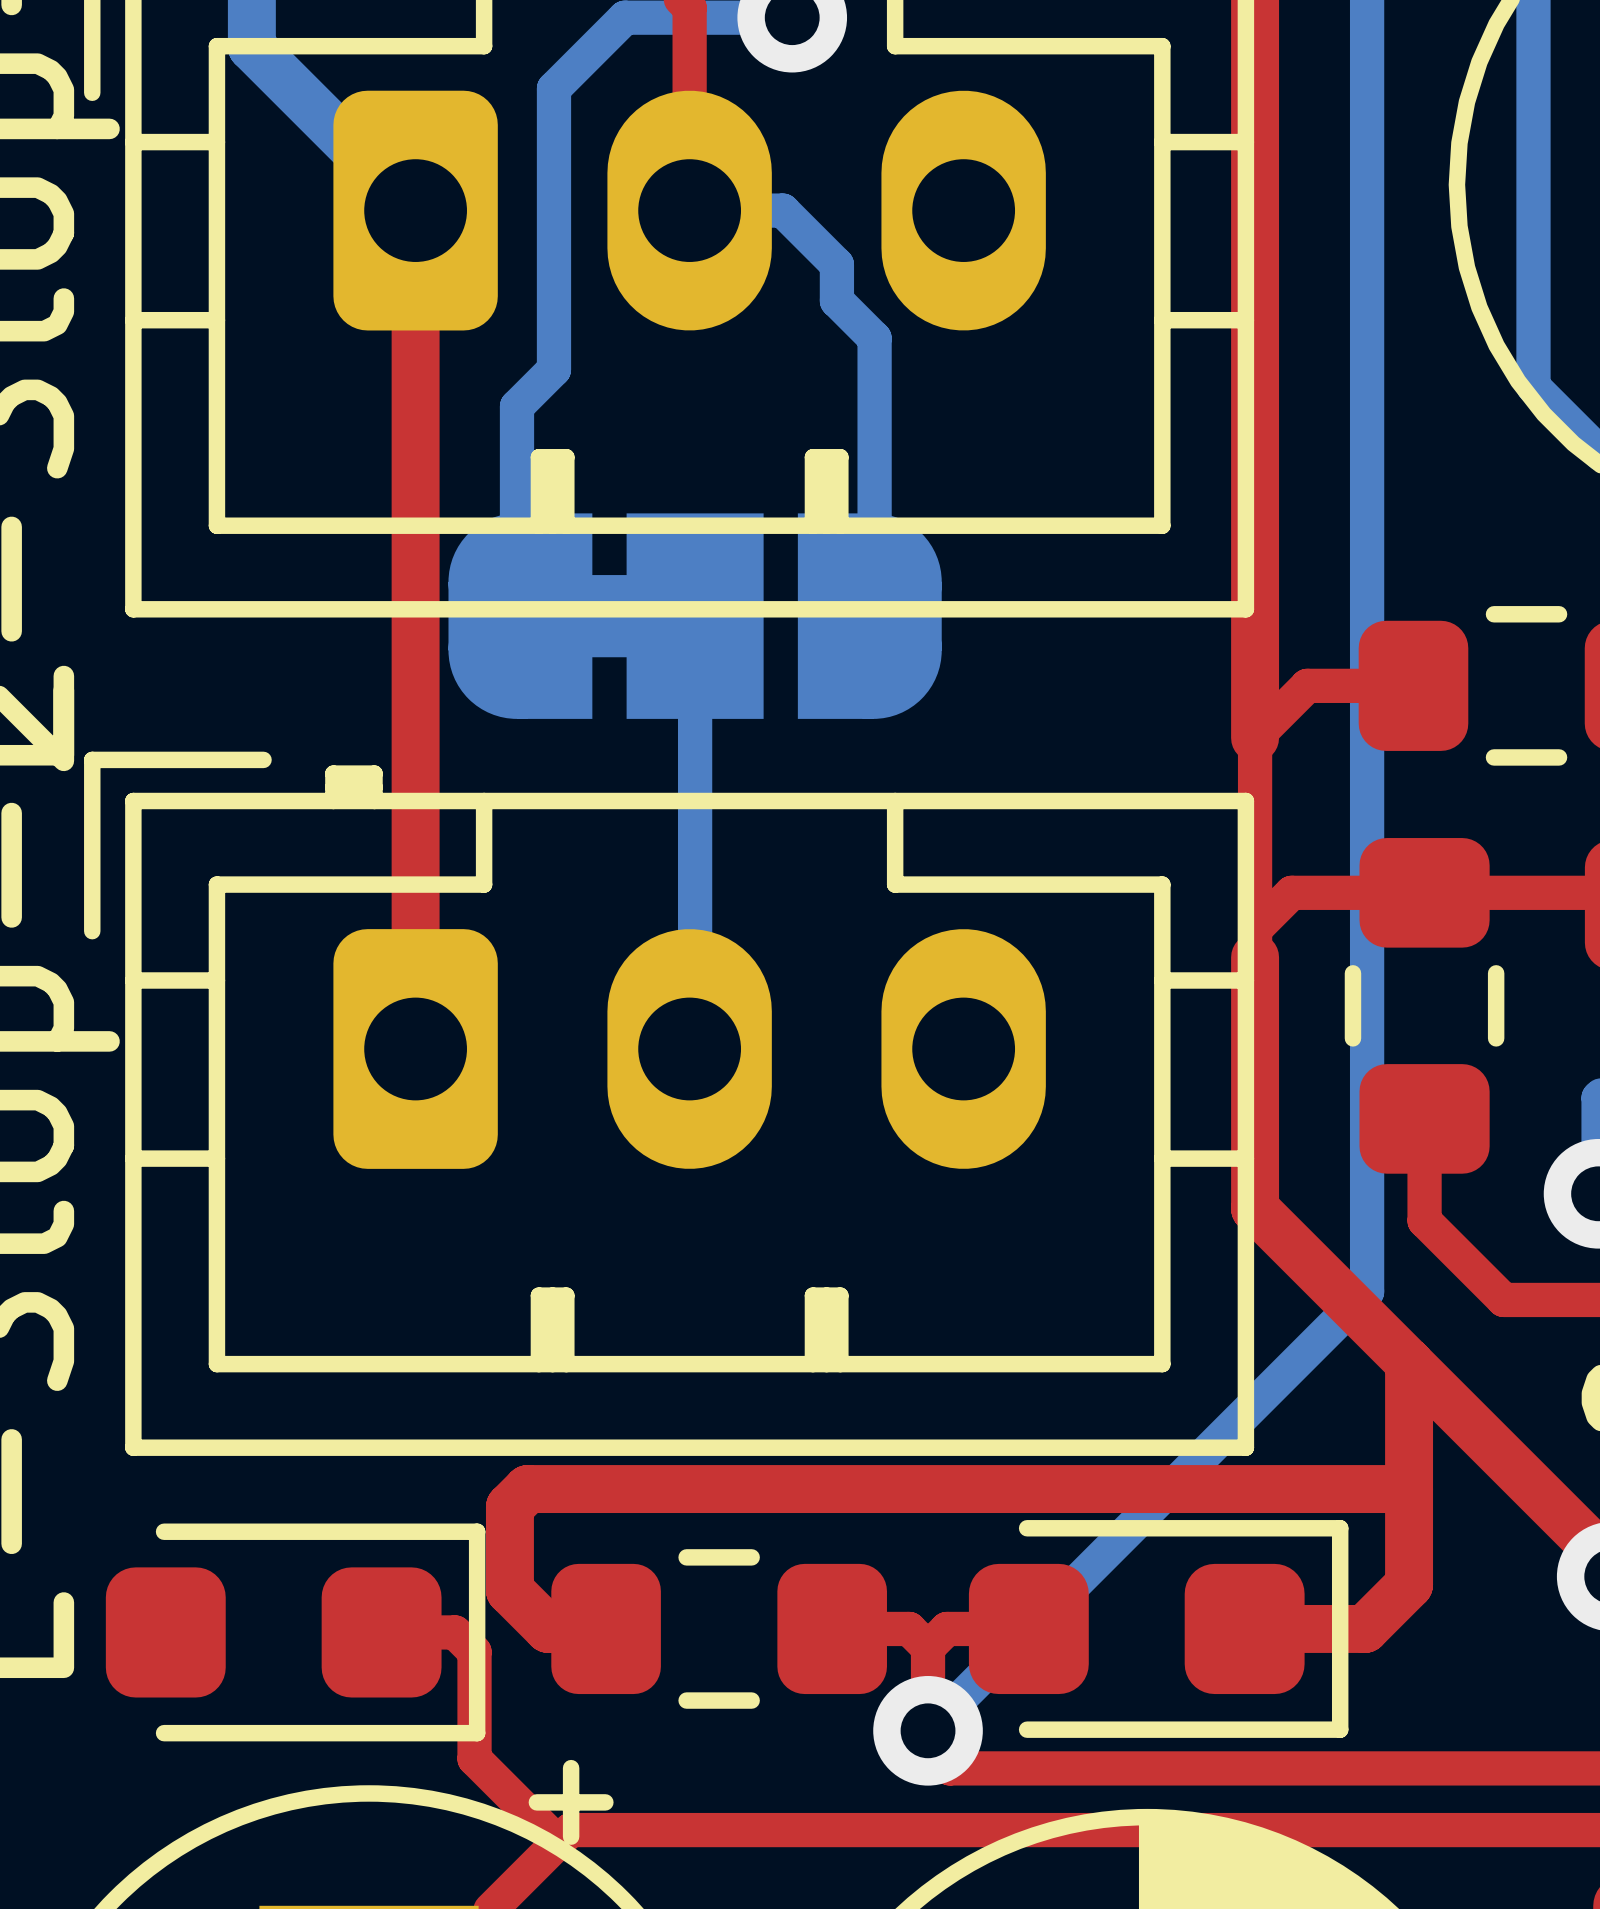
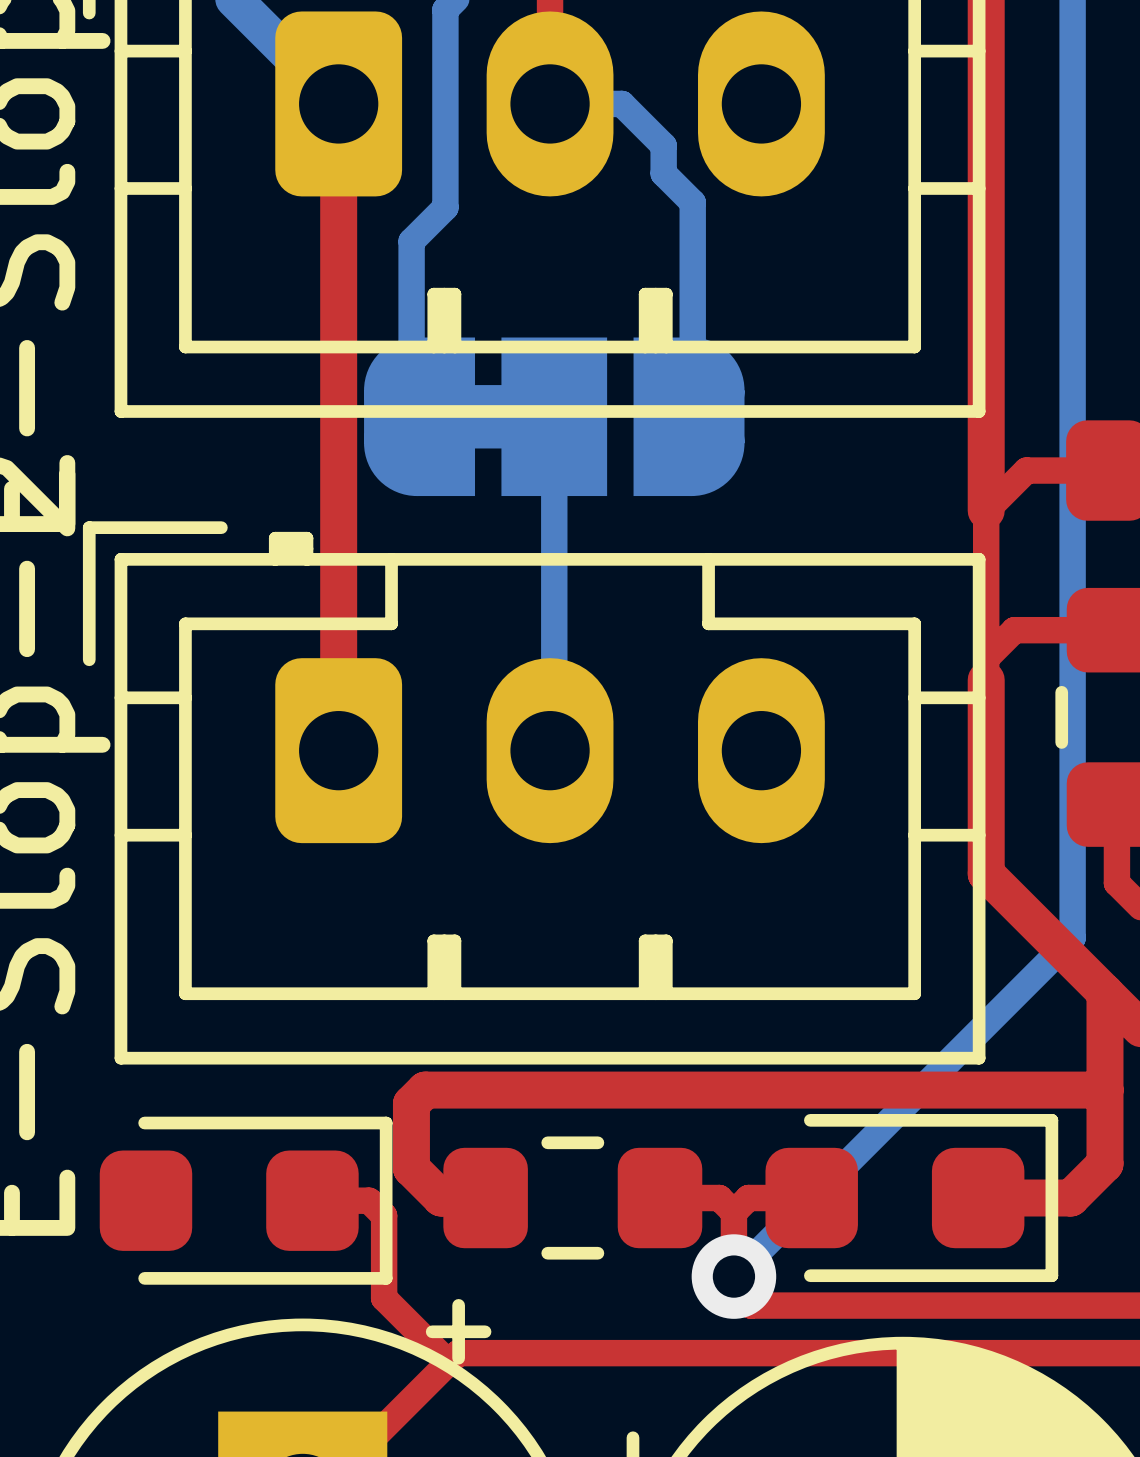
bottom track: (553, 344) (553, 369) (516, 406) (516, 616) -> (445, 207) (411, 241) (411, 411) (416, 416)

